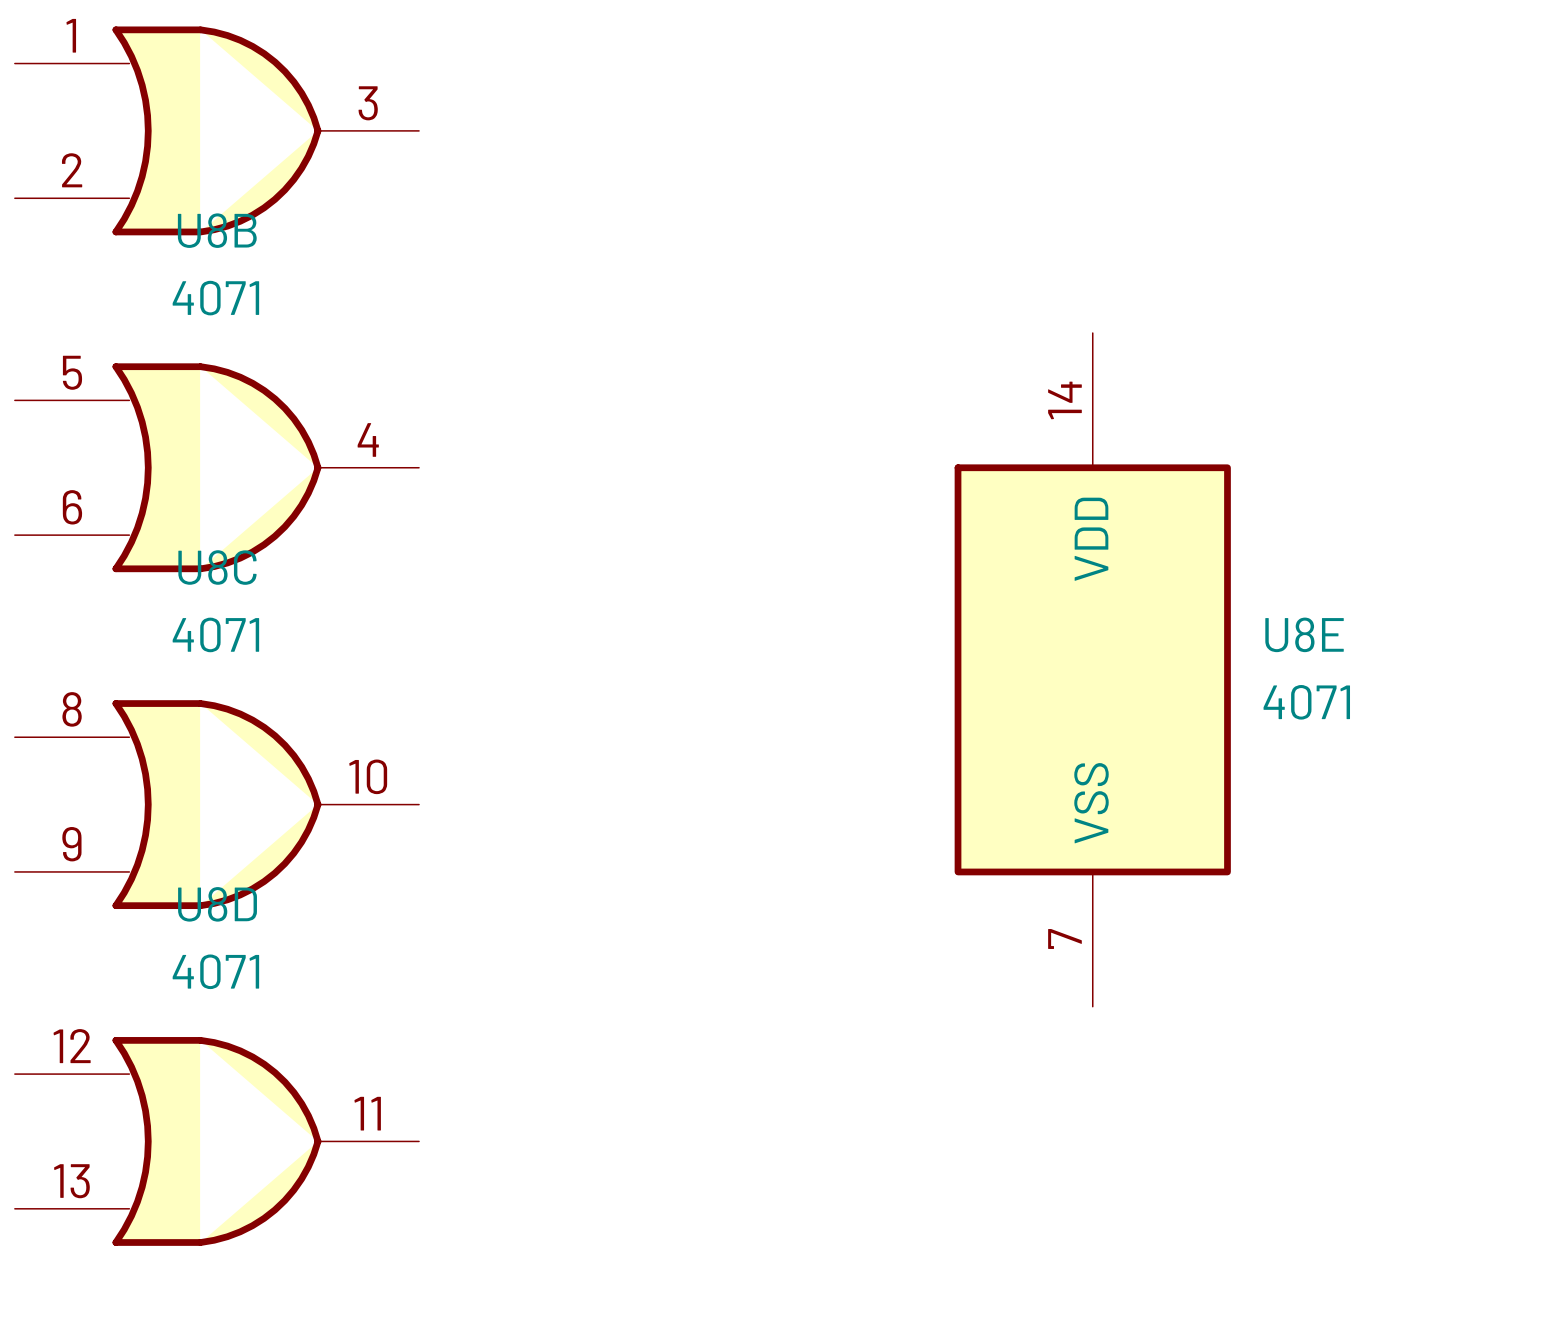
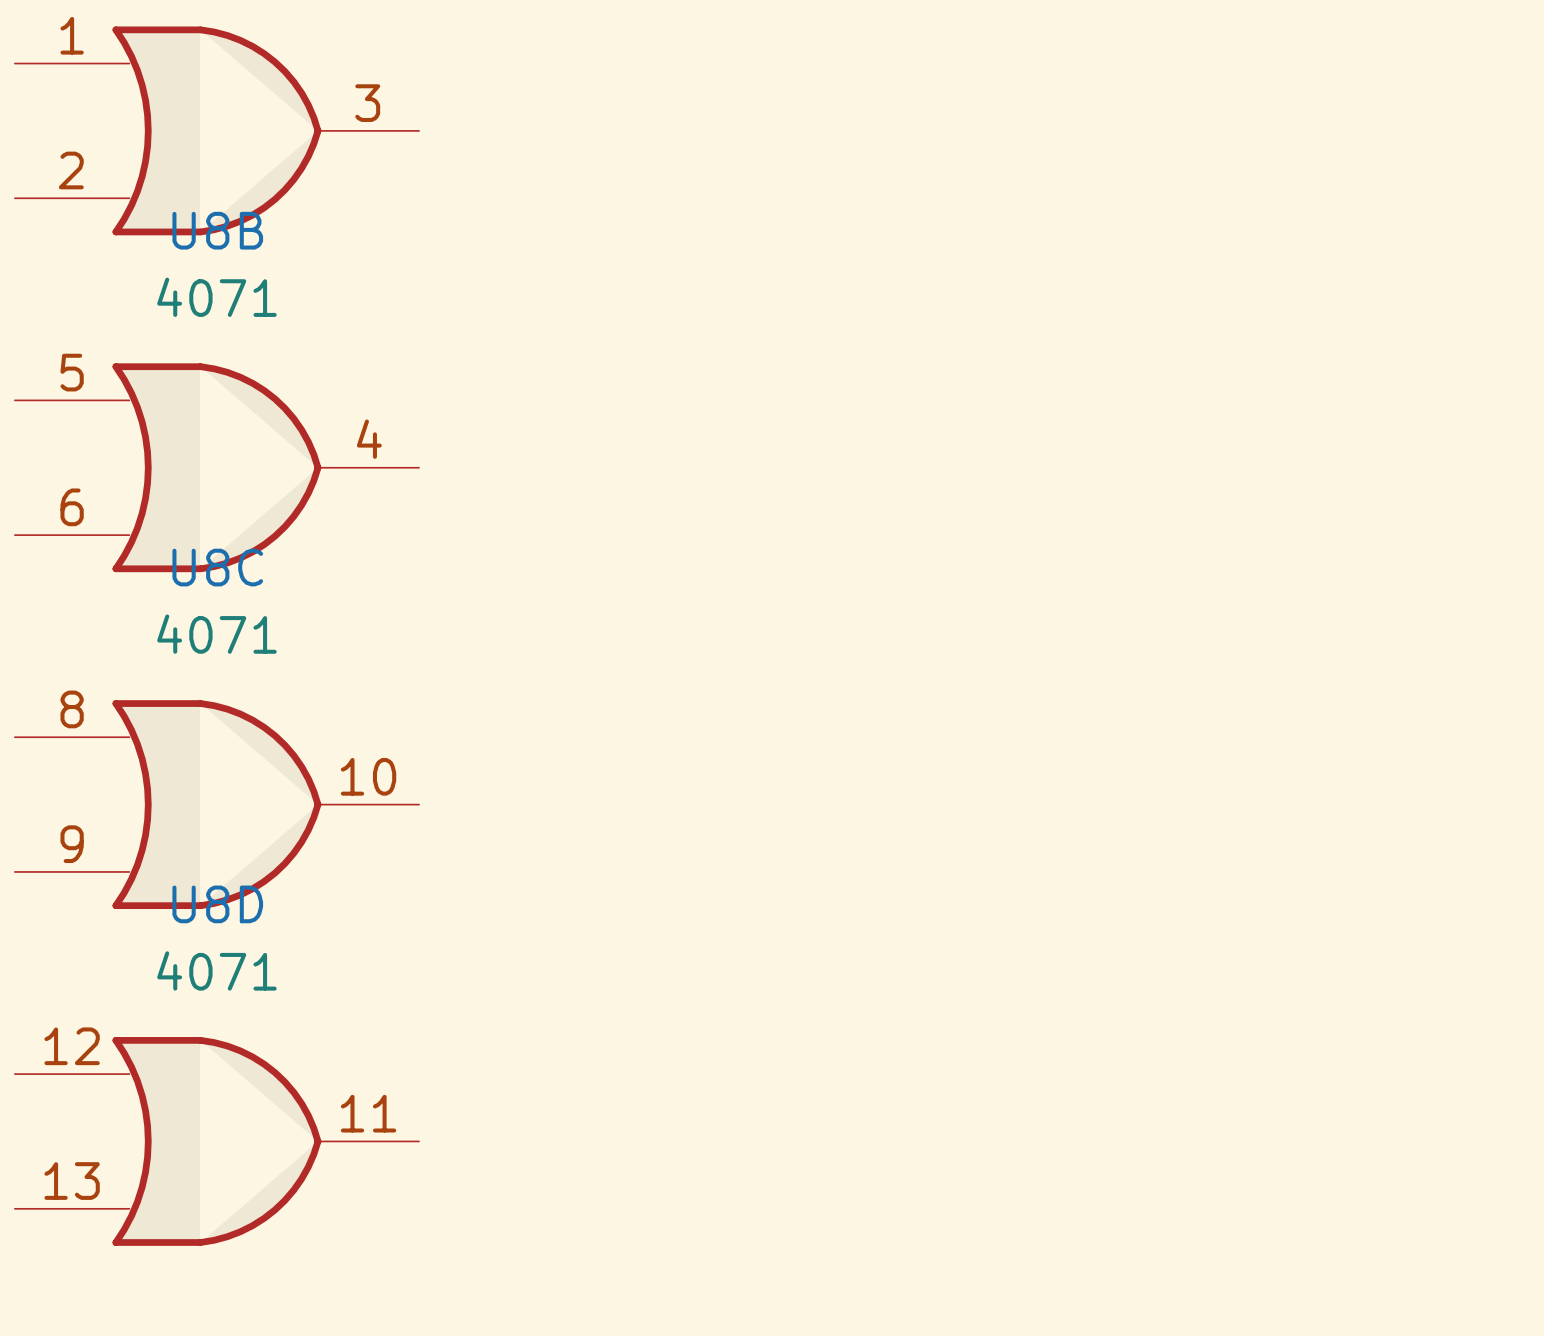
U8E: 4071 (1092, 669) -> none

